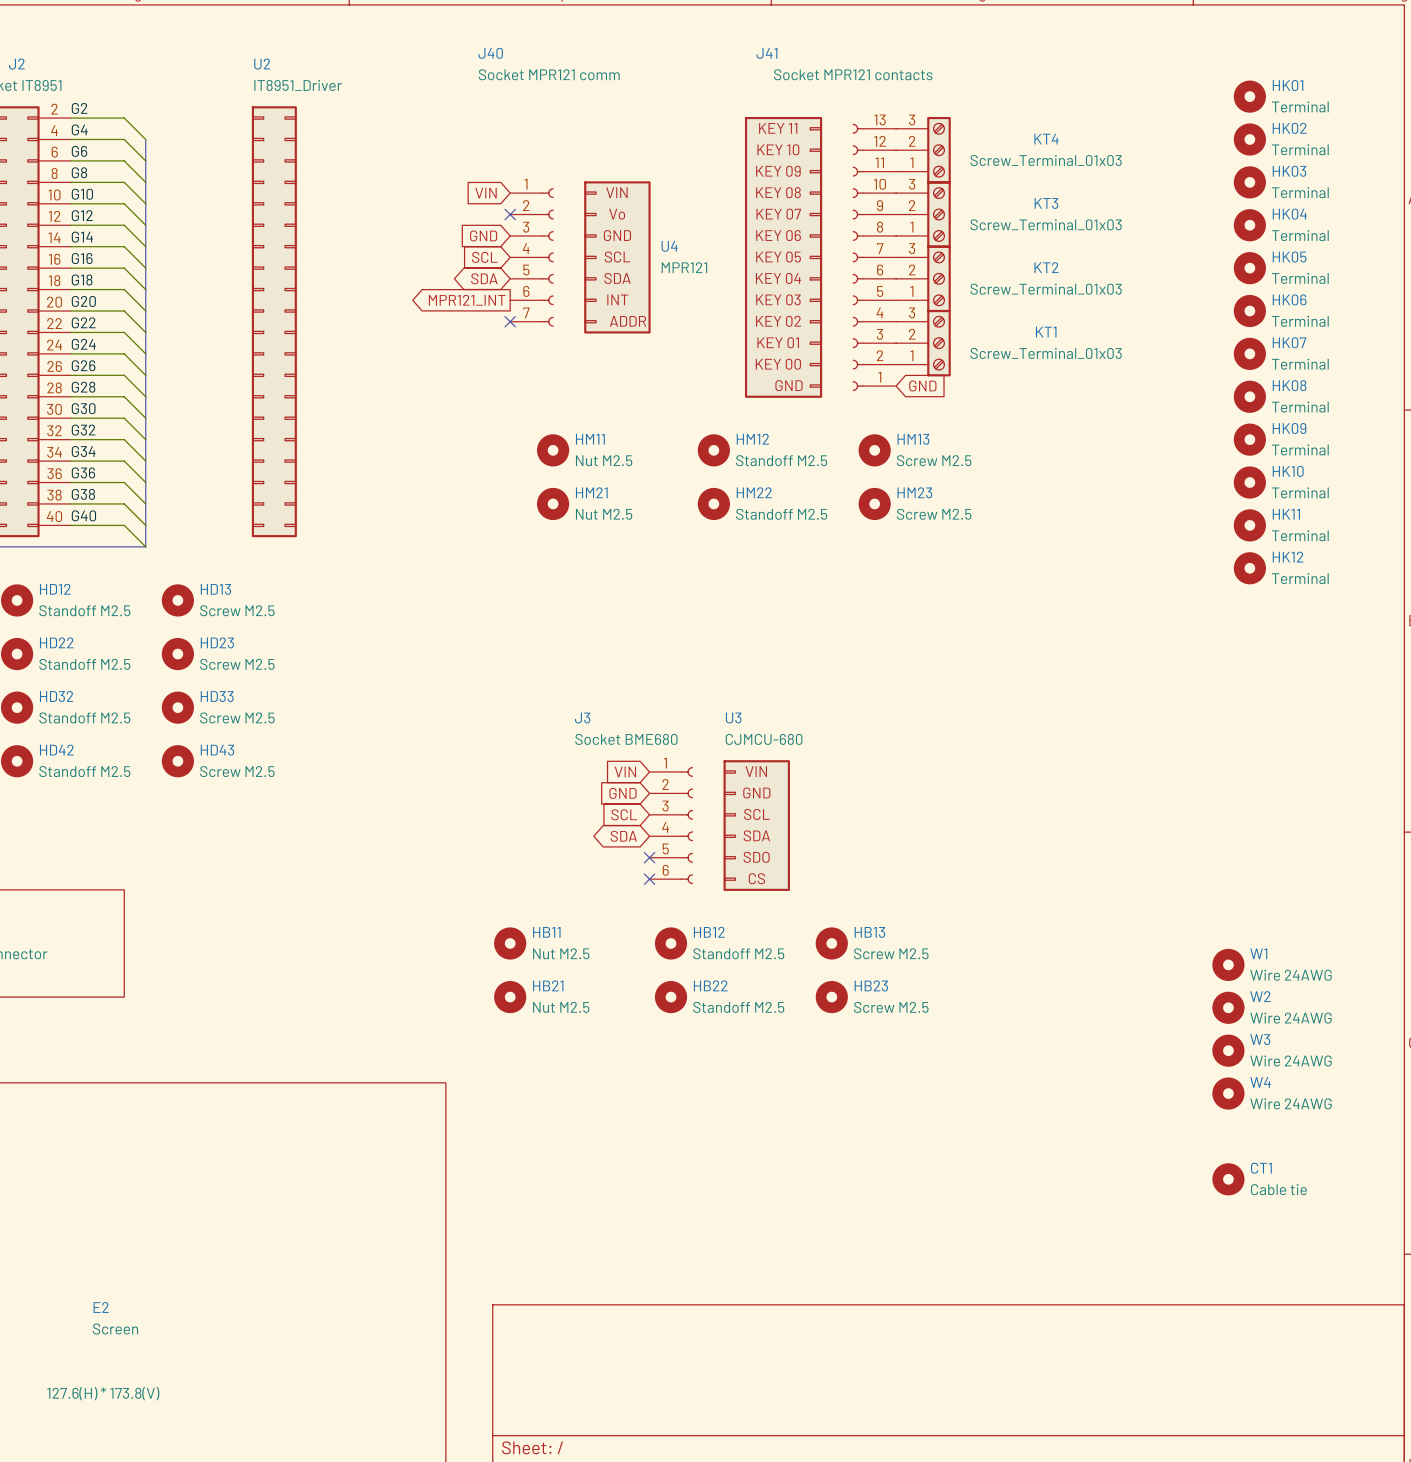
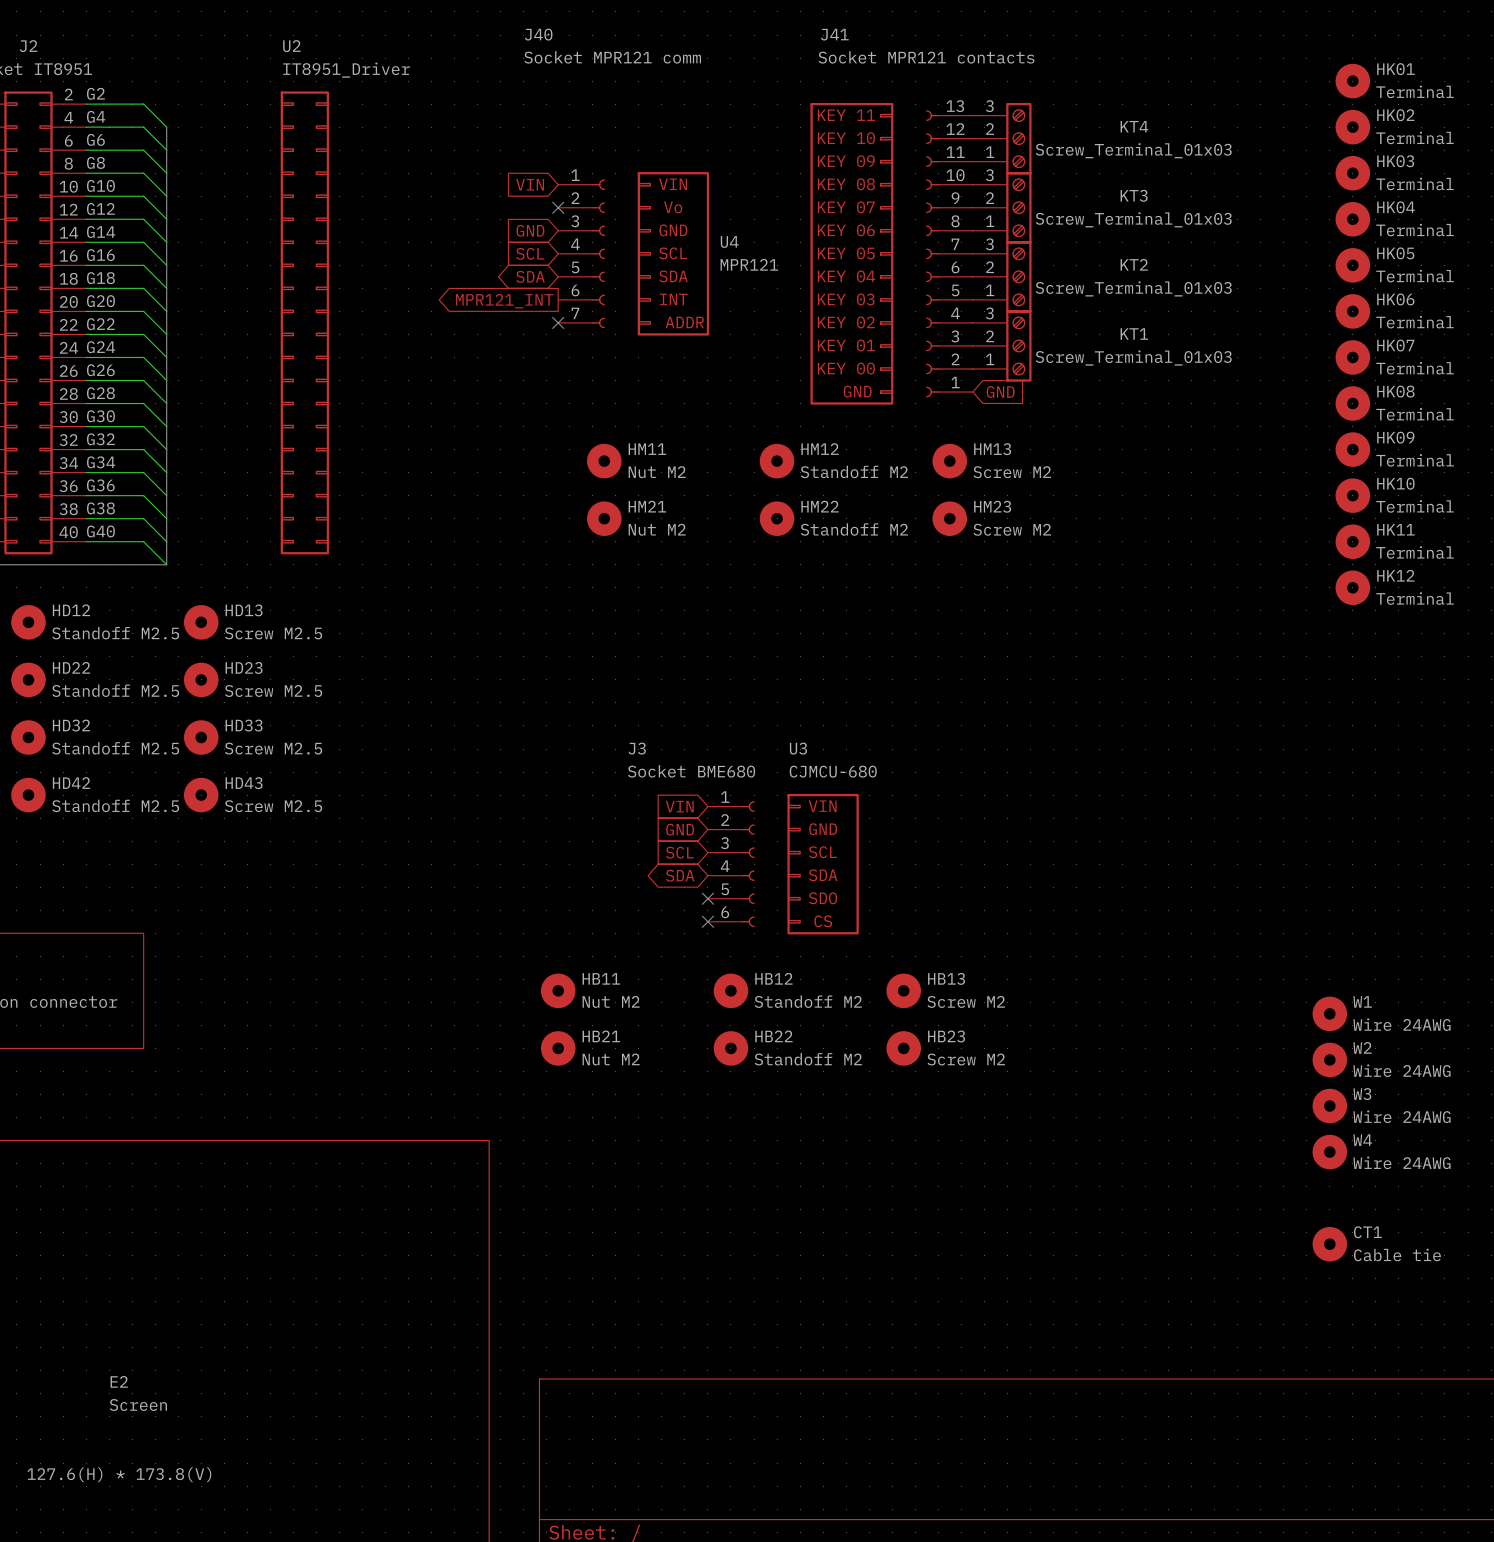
HM11 value: Nut M2.5 (604, 460) -> Nut M2 (657, 472)
HM12 value: Standoff M2.5 (781, 460) -> Standoff M2 (854, 471)
HM13 value: Screw M2.5 (934, 460) -> Screw M2 (1012, 472)
HM21 value: Nut M2.5 (604, 514) -> Nut M2 (657, 529)
HM22 value: Standoff M2.5 (781, 514) -> Standoff M2 (854, 529)
HM23 value: Screw M2.5 (934, 514) -> Screw M2 (1012, 529)
HB11 value: Nut M2.5 (561, 953) -> Nut M2 (611, 1001)
HB12 value: Standoff M2.5 (738, 953) -> Standoff M2 (808, 1001)
HB13 value: Screw M2.5 (891, 953) -> Screw M2 (966, 1001)
HB21 value: Nut M2.5 (561, 1007) -> Nut M2 (611, 1059)
HB22 value: Standoff M2.5 (738, 1007) -> Standoff M2 (808, 1059)
HB23 value: Screw M2.5 (891, 1007) -> Screw M2 (966, 1059)

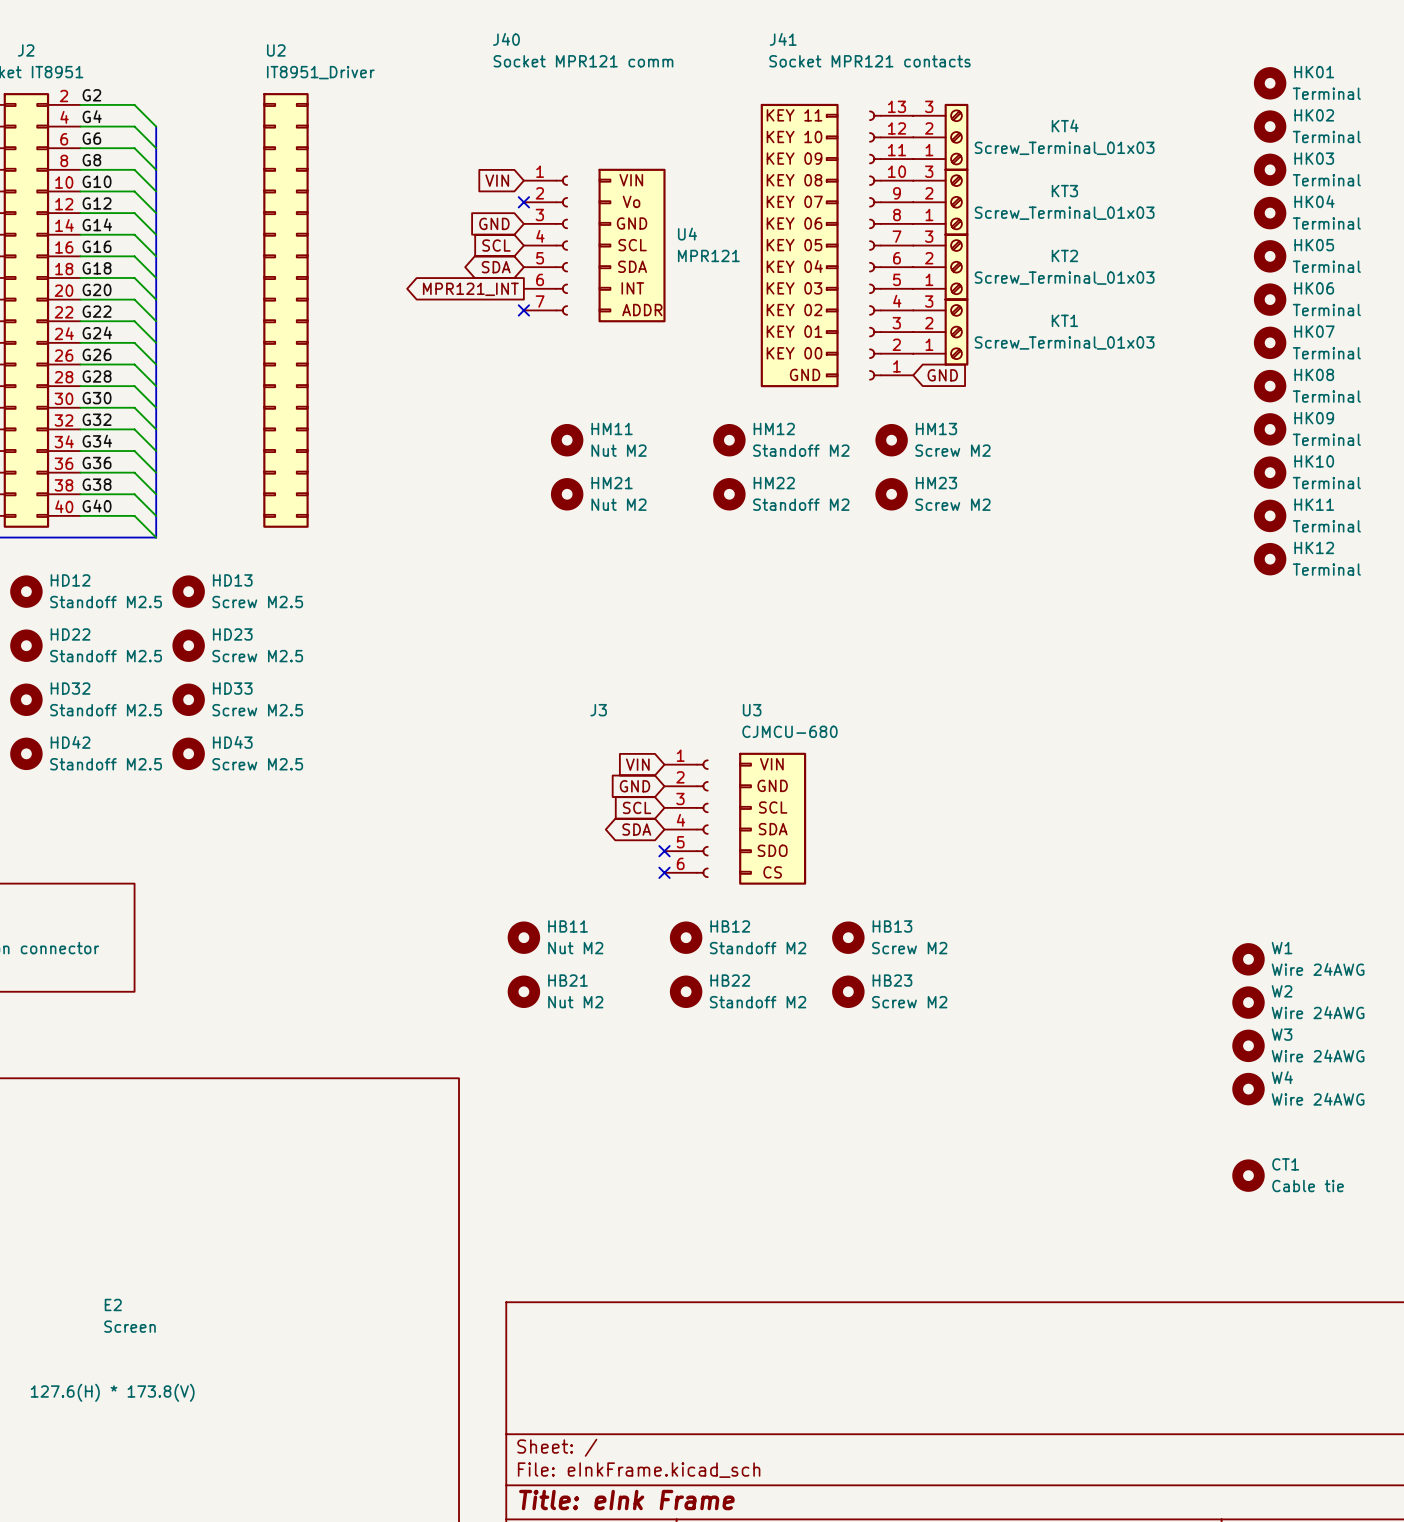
J3 value: Socket BME680 (691, 771) -> none

